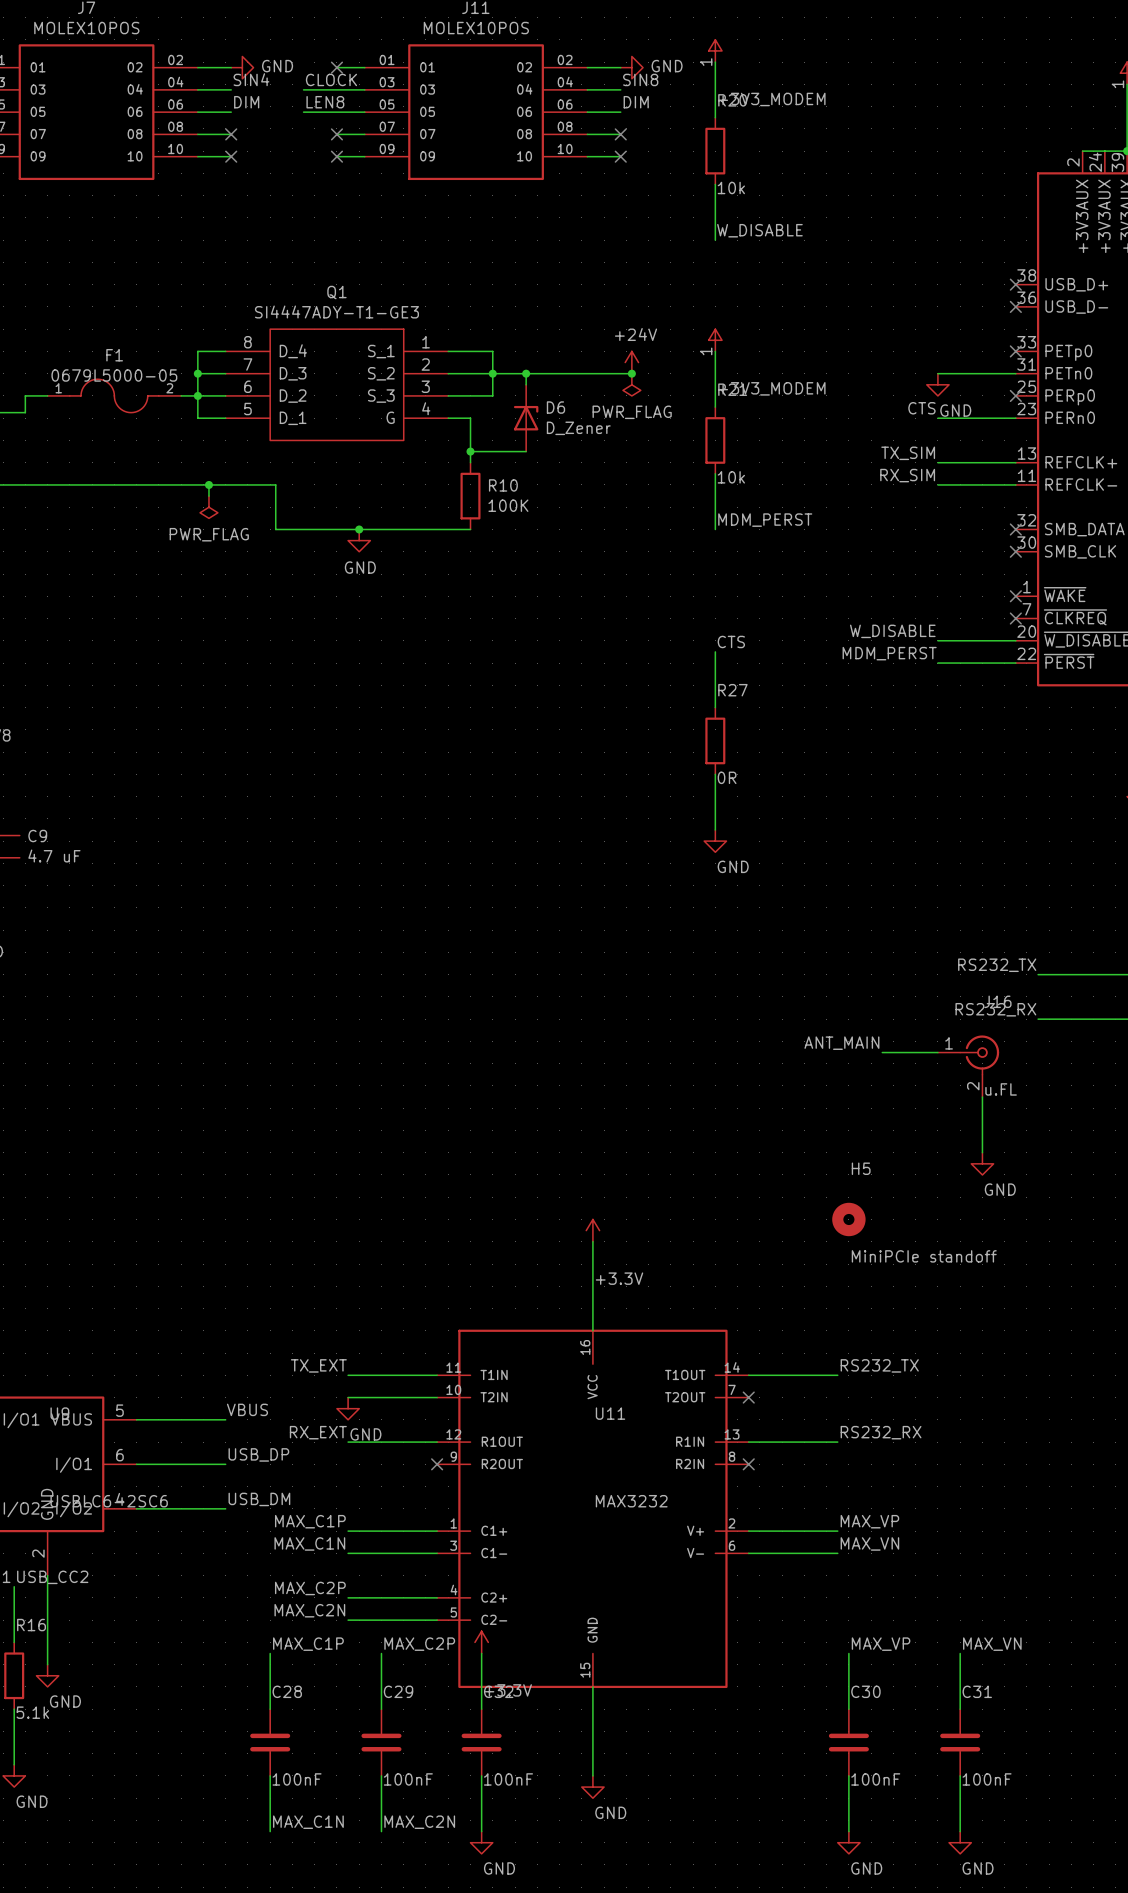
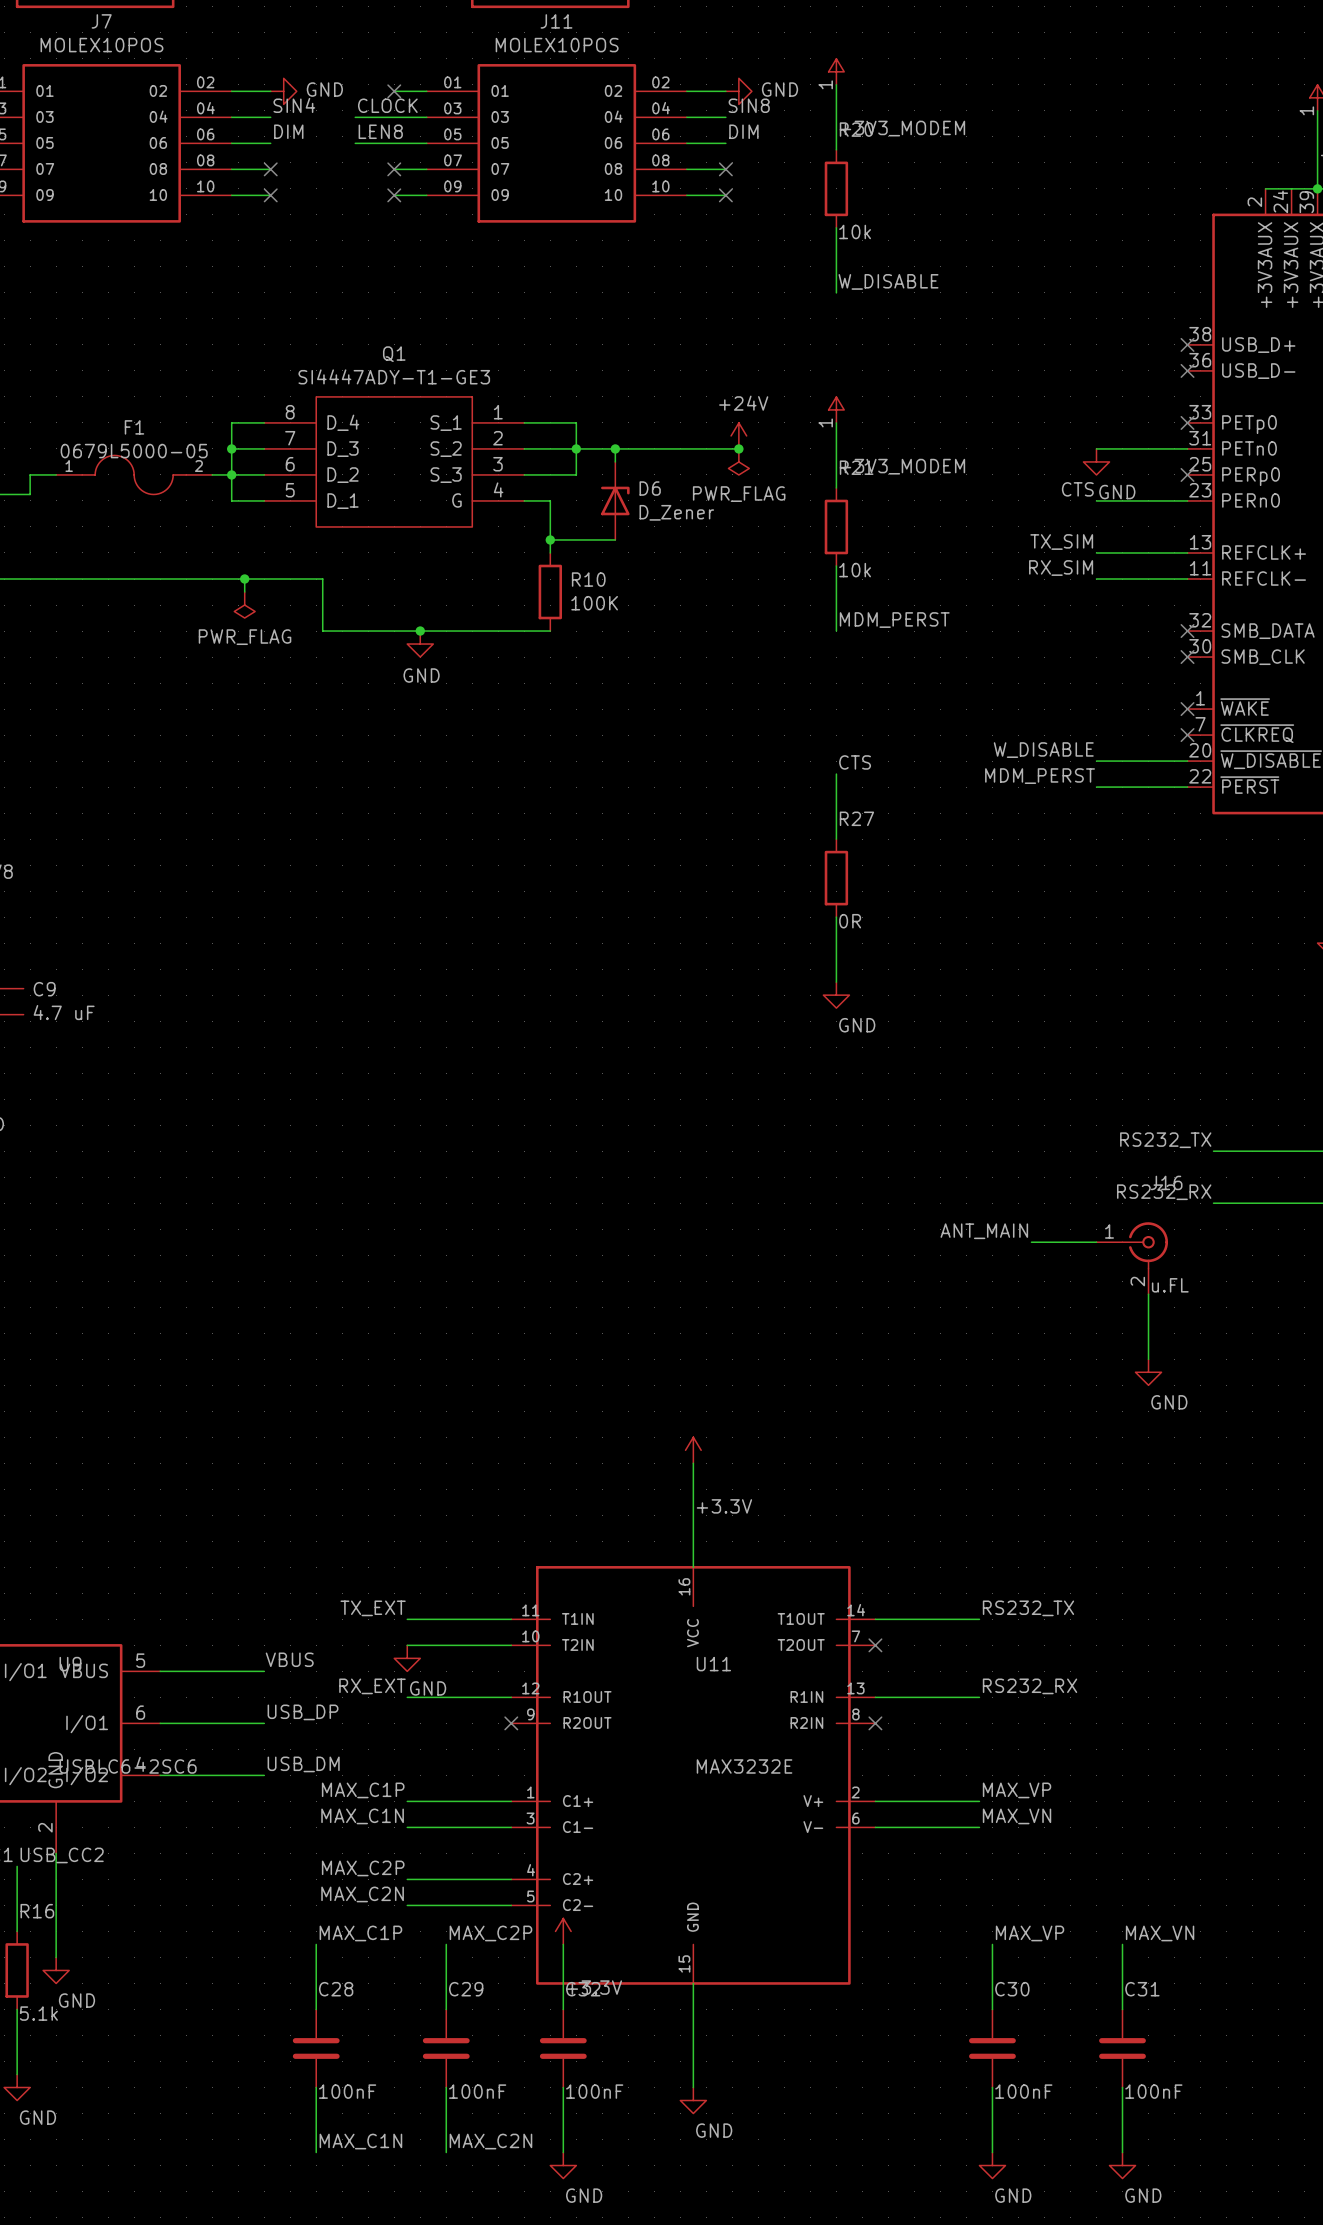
H5: MiniPCIe standoff (848, 1219) -> none
U11 value: MAX3232 (631, 1501) -> MAX3232E (744, 1766)

